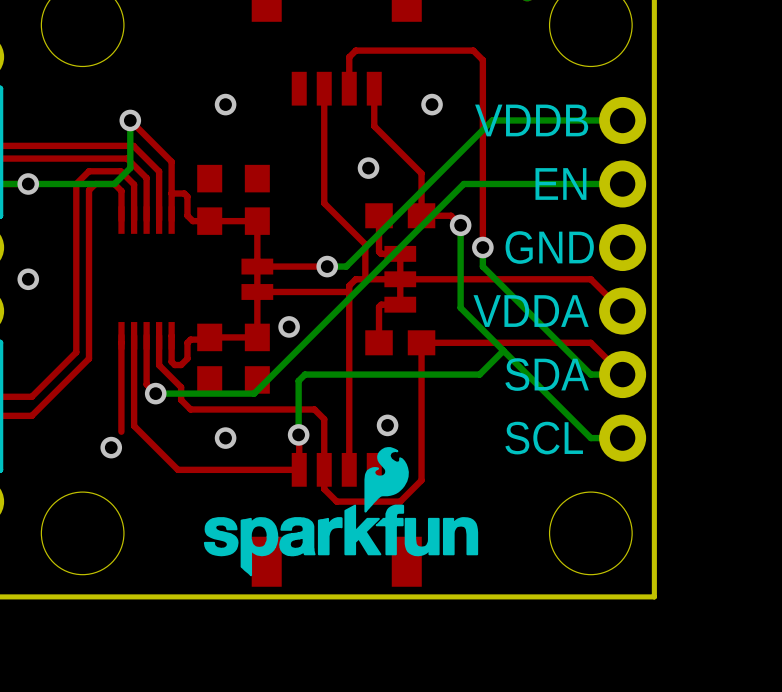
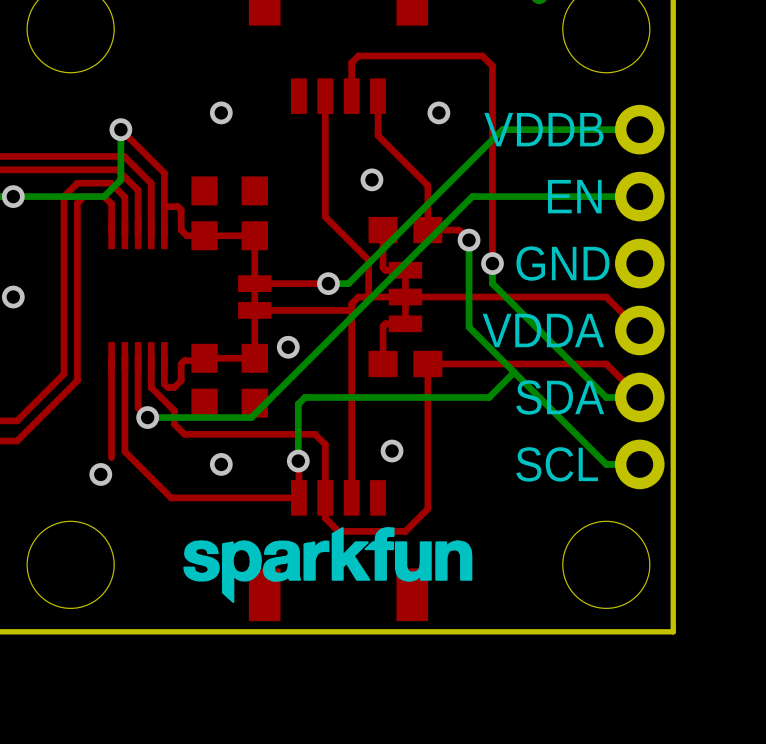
drawing: [203, 447, 479, 577] -> none
drawing: none -> [183, 527, 473, 603]

